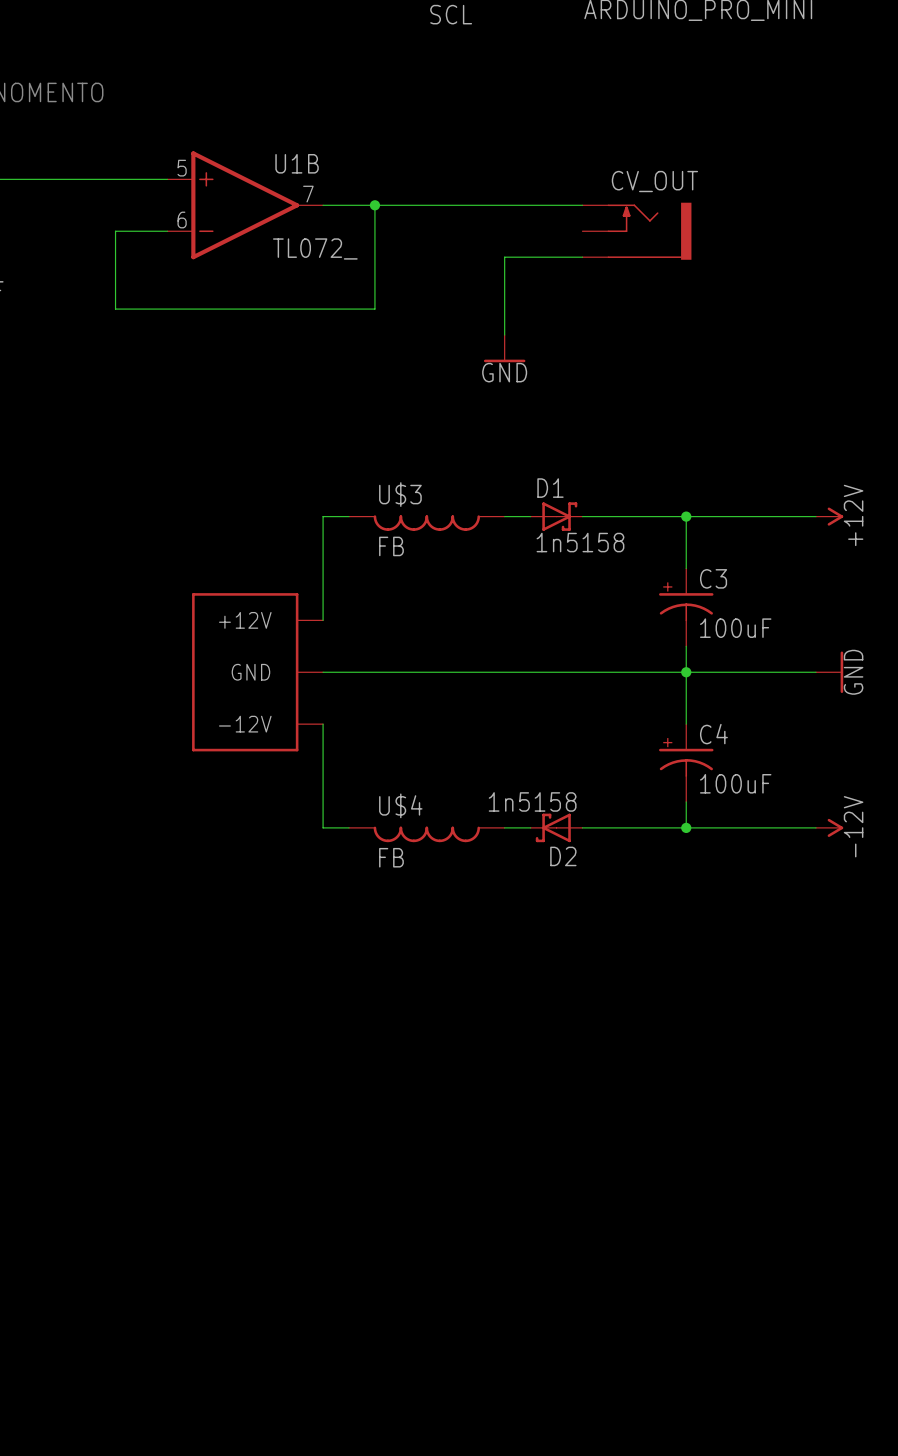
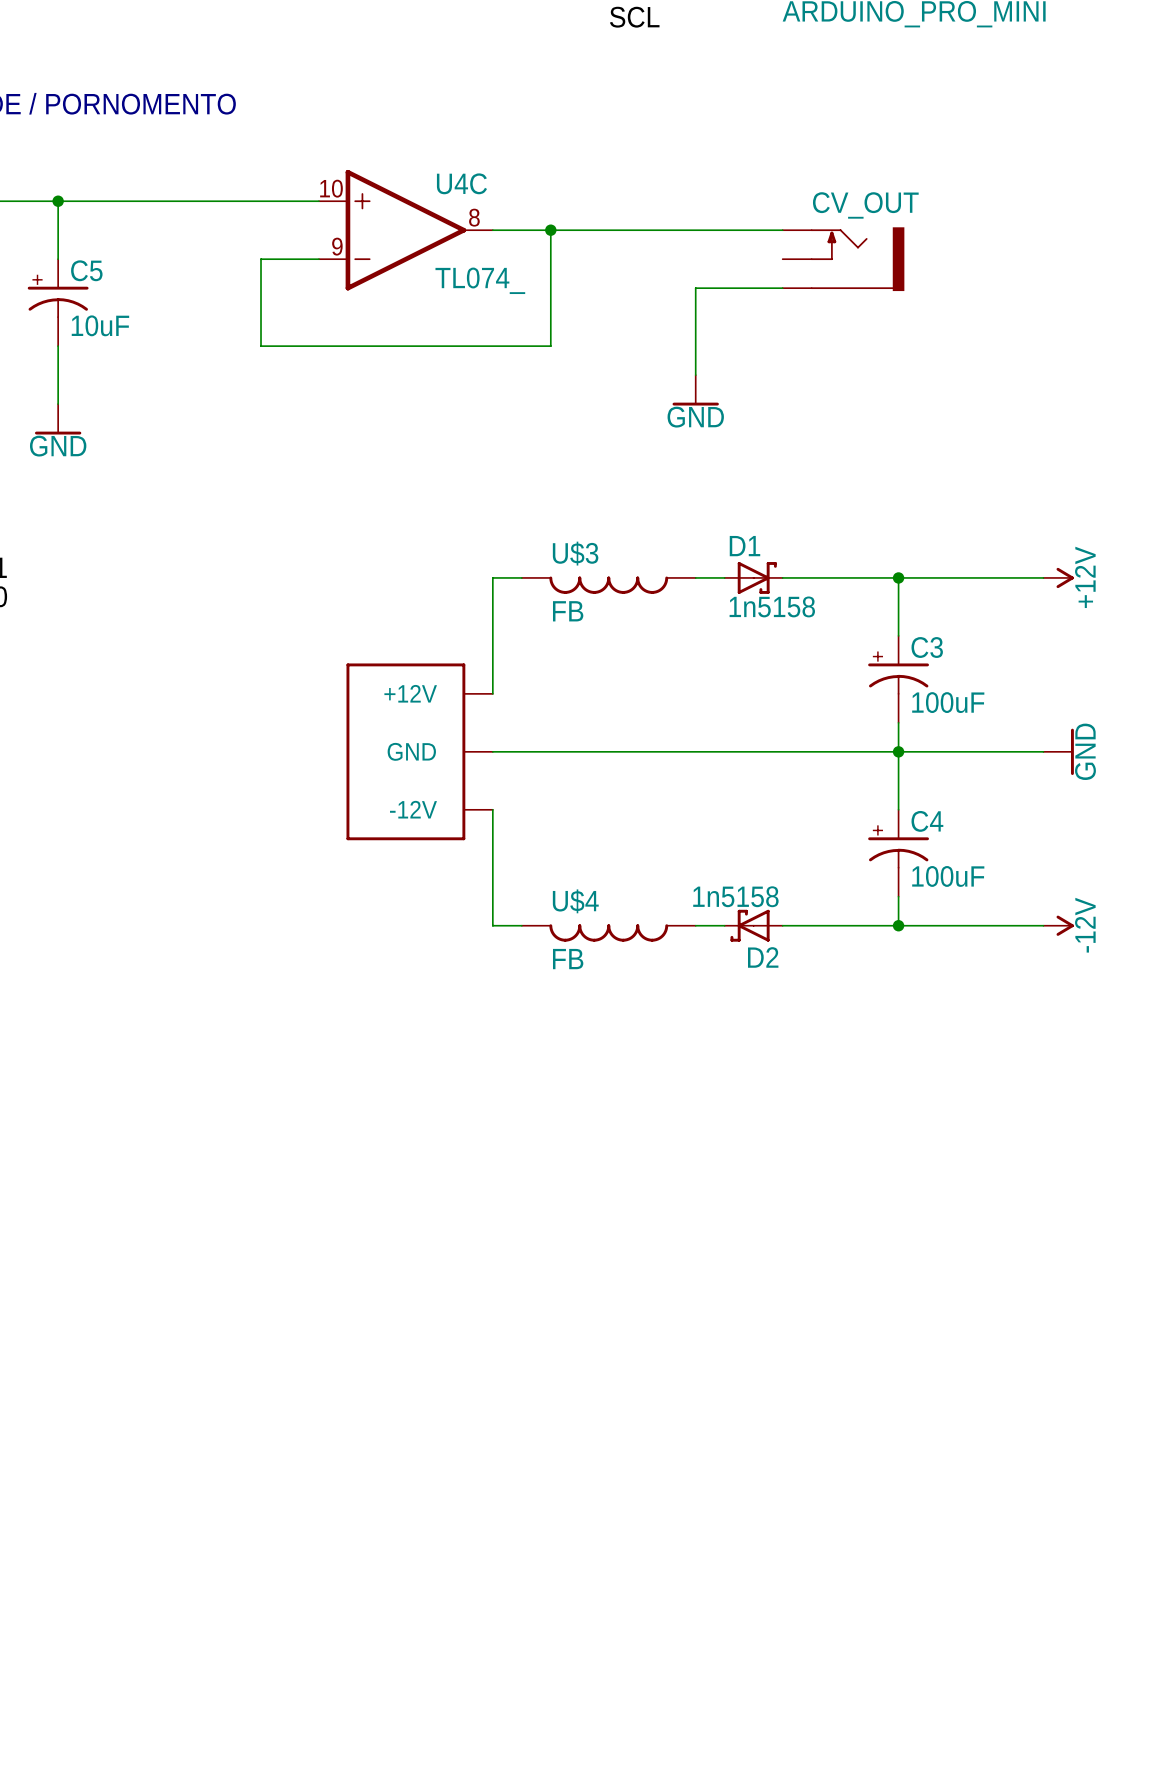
U1B name: U1B (297, 163) -> U4C (461, 183)
U1B pin number: 5 (182, 168) -> 10 (331, 188)
U1B pin number: 7 (308, 194) -> 8 (474, 217)
U1B pin number: 6 (182, 220) -> 9 (337, 246)
U1B value: TL072_ (315, 248) -> TL074_ (480, 280)

